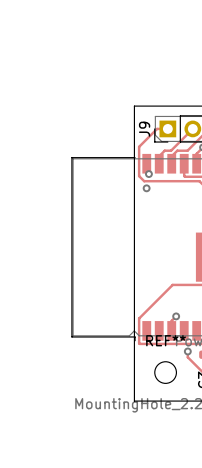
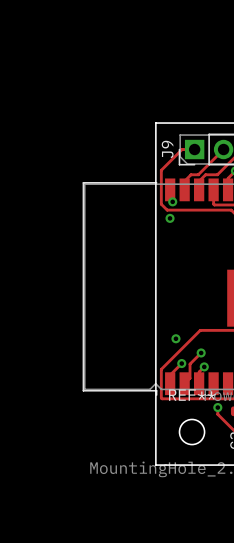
via: none -> (175, 338)
track: none -> (201, 352) (190, 364) (190, 378) (184, 383)
via: none -> (201, 352)
track: none -> (181, 363) (170, 375)
via: none -> (181, 363)

